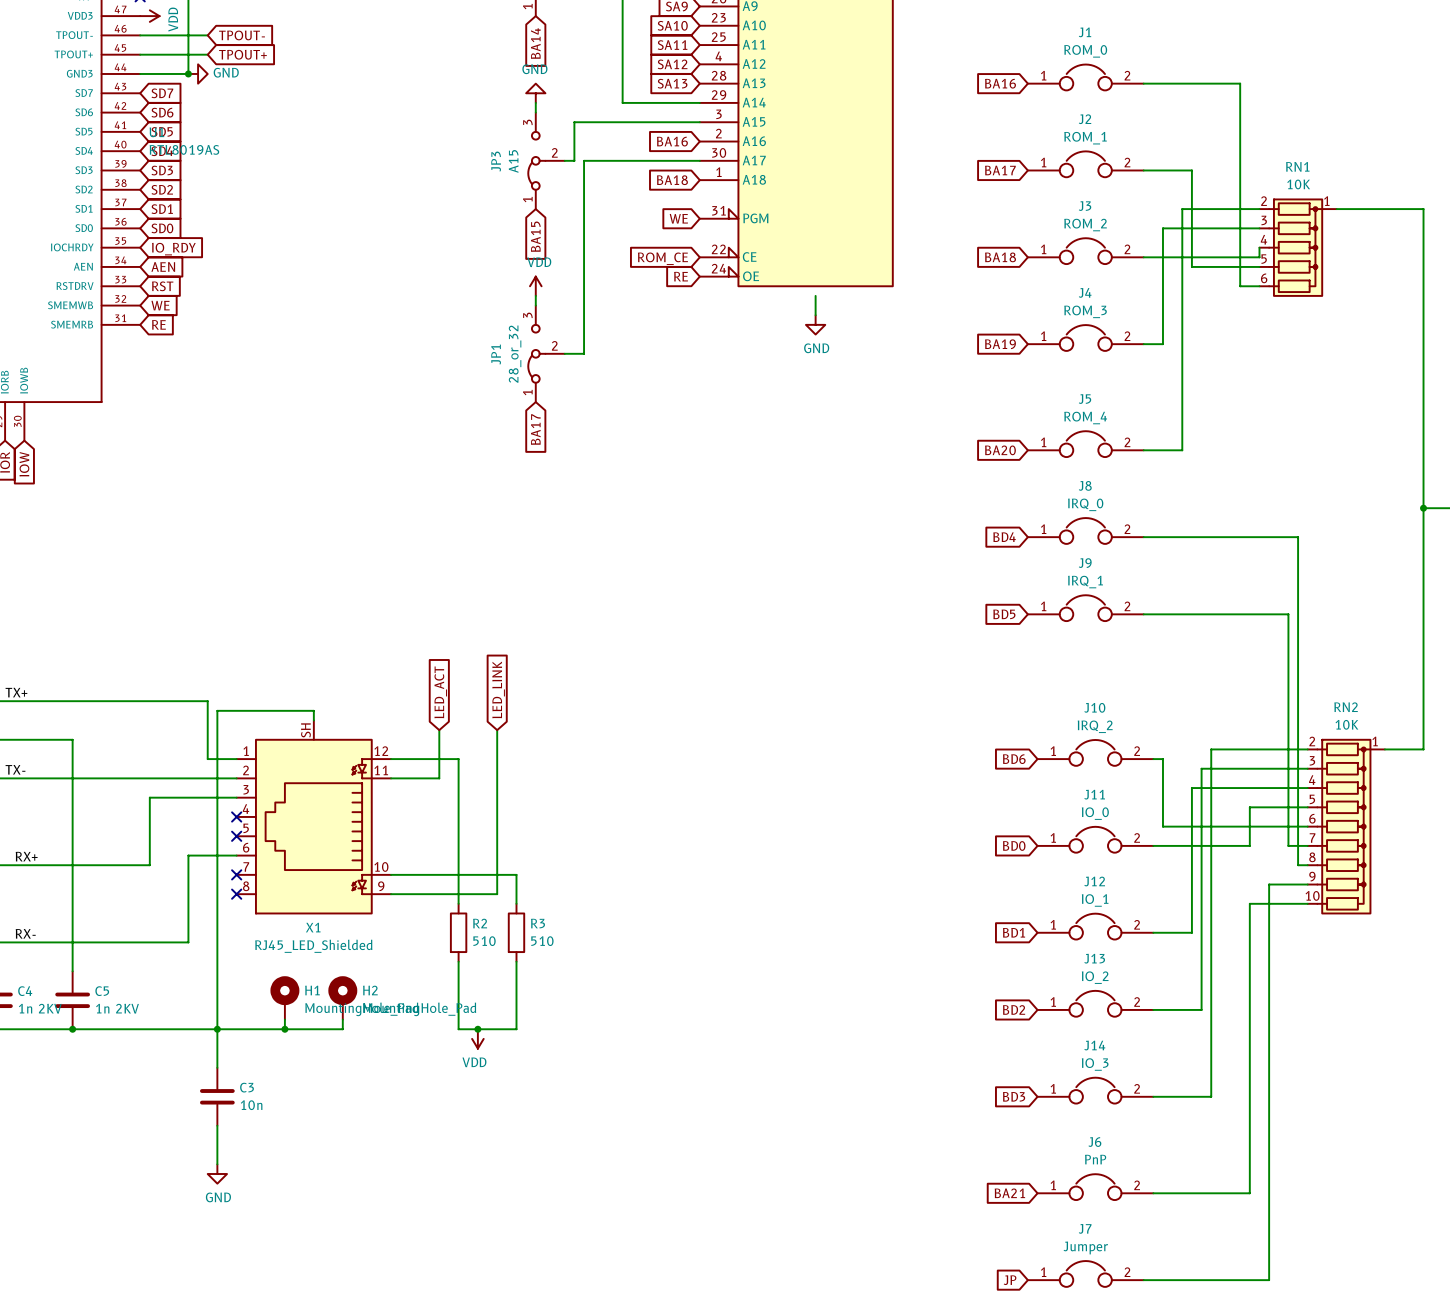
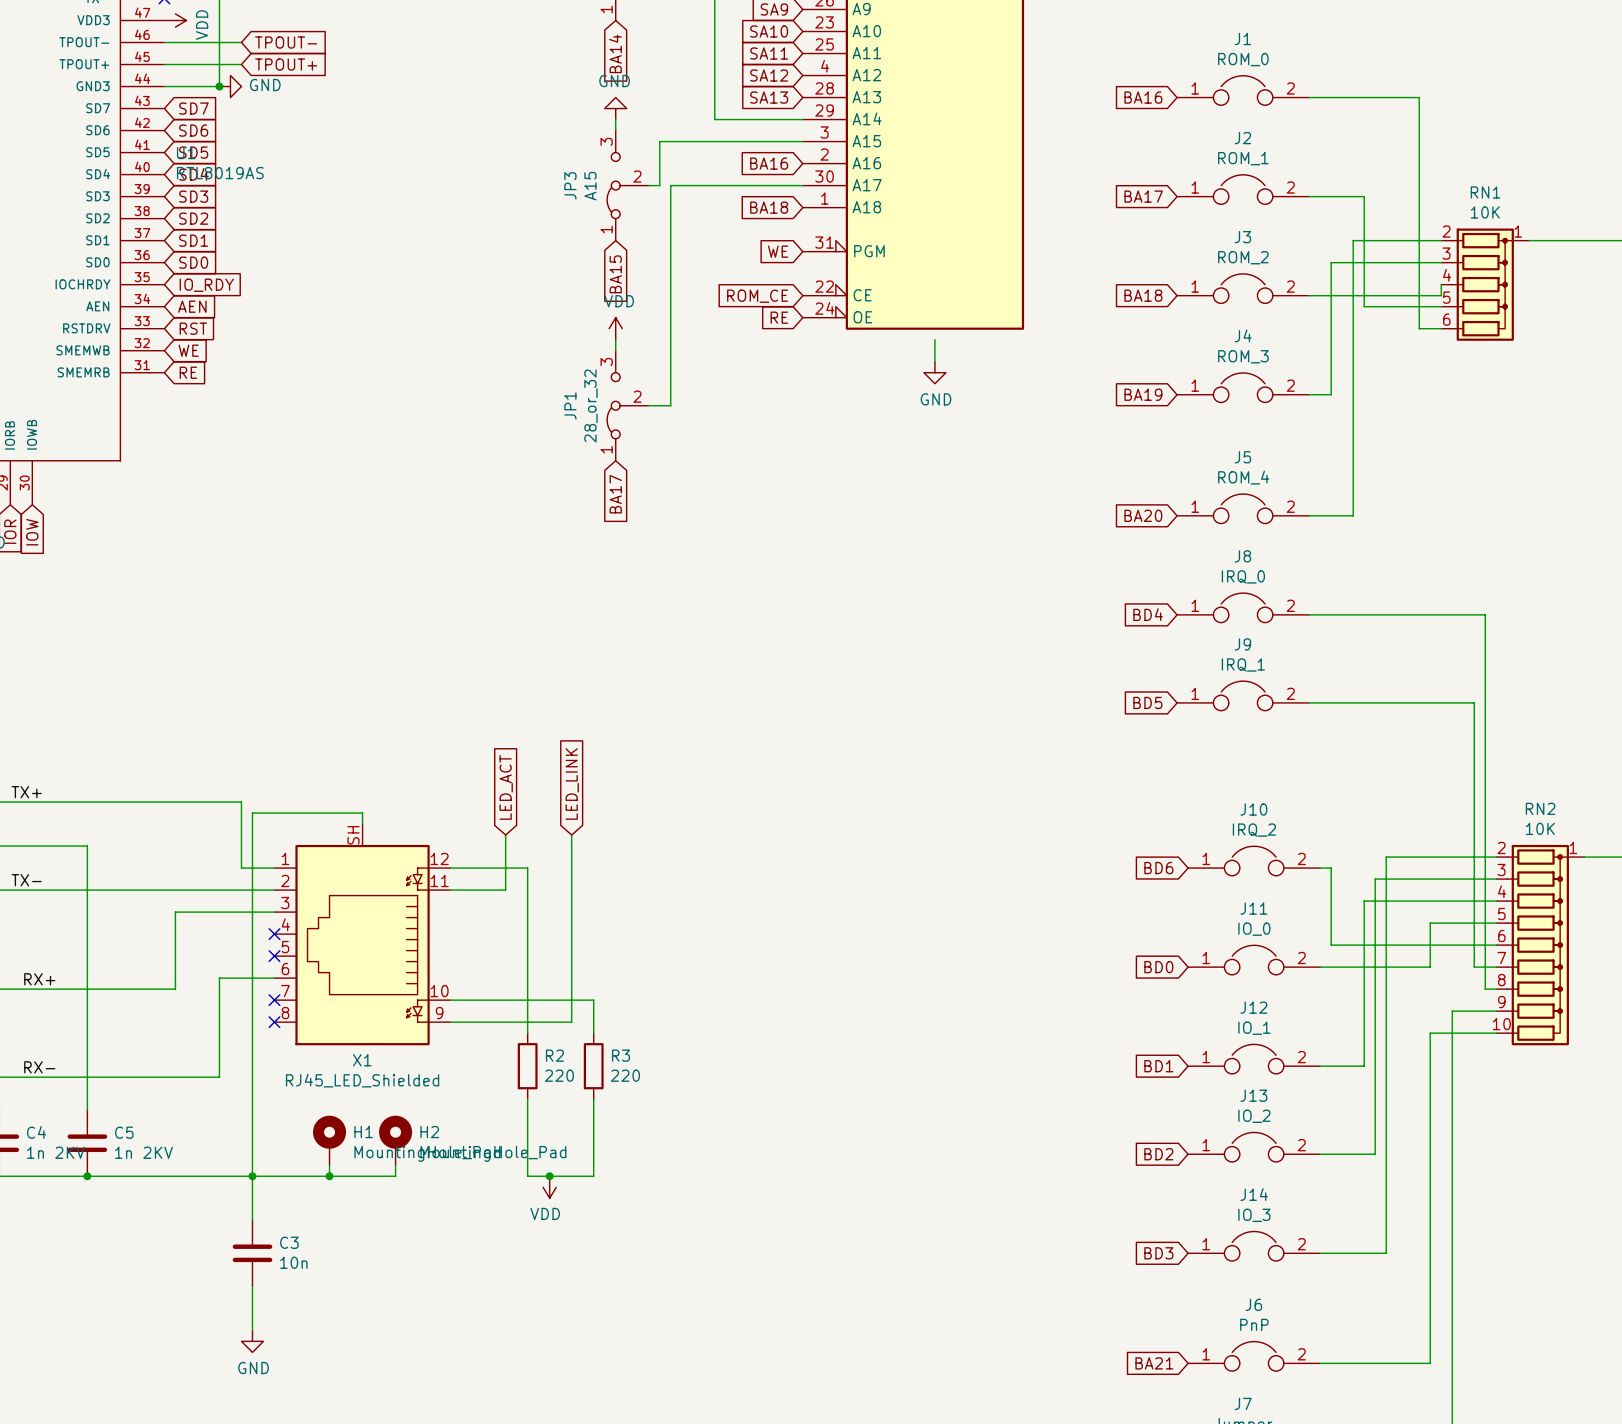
R2 value: 510 (484, 941) -> 220 (559, 1075)
R3 value: 510 (542, 941) -> 220 (625, 1075)

